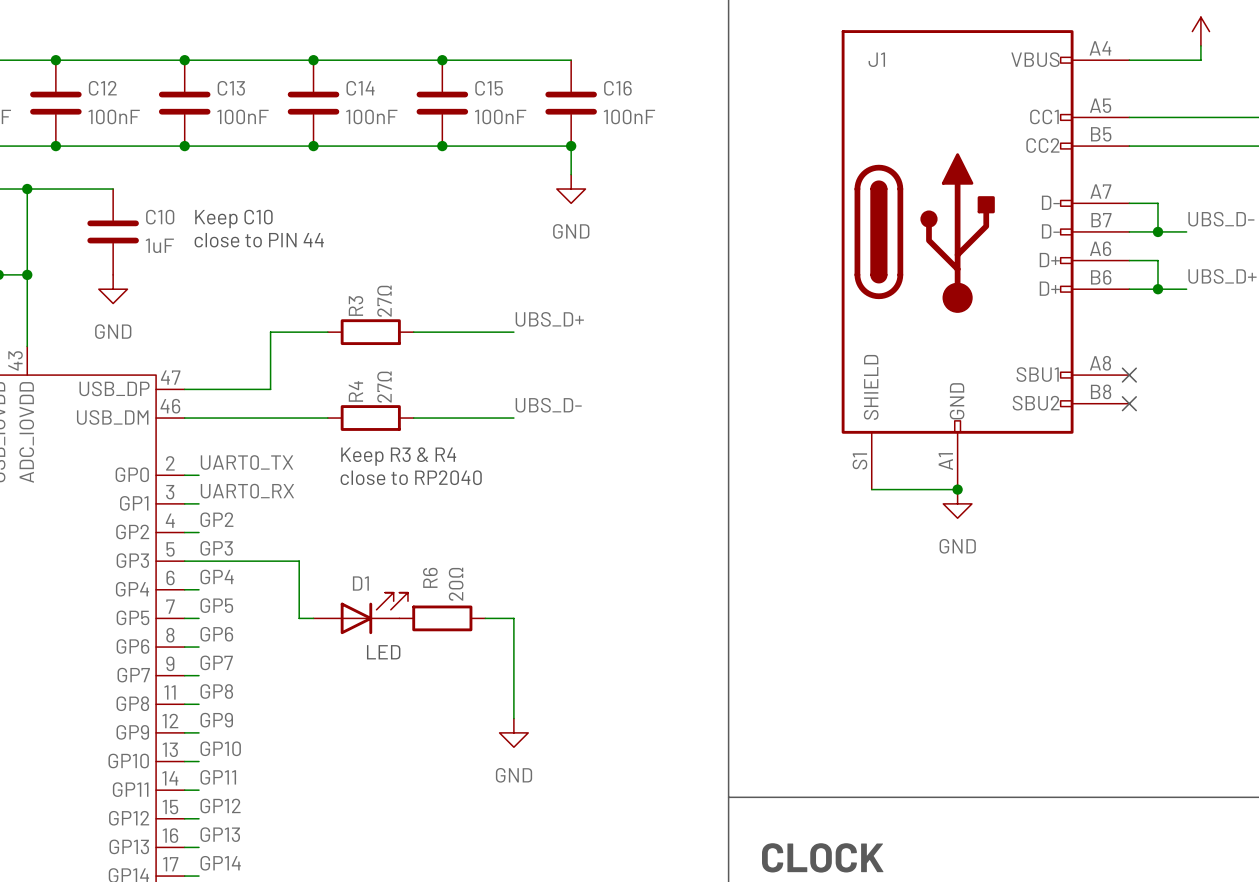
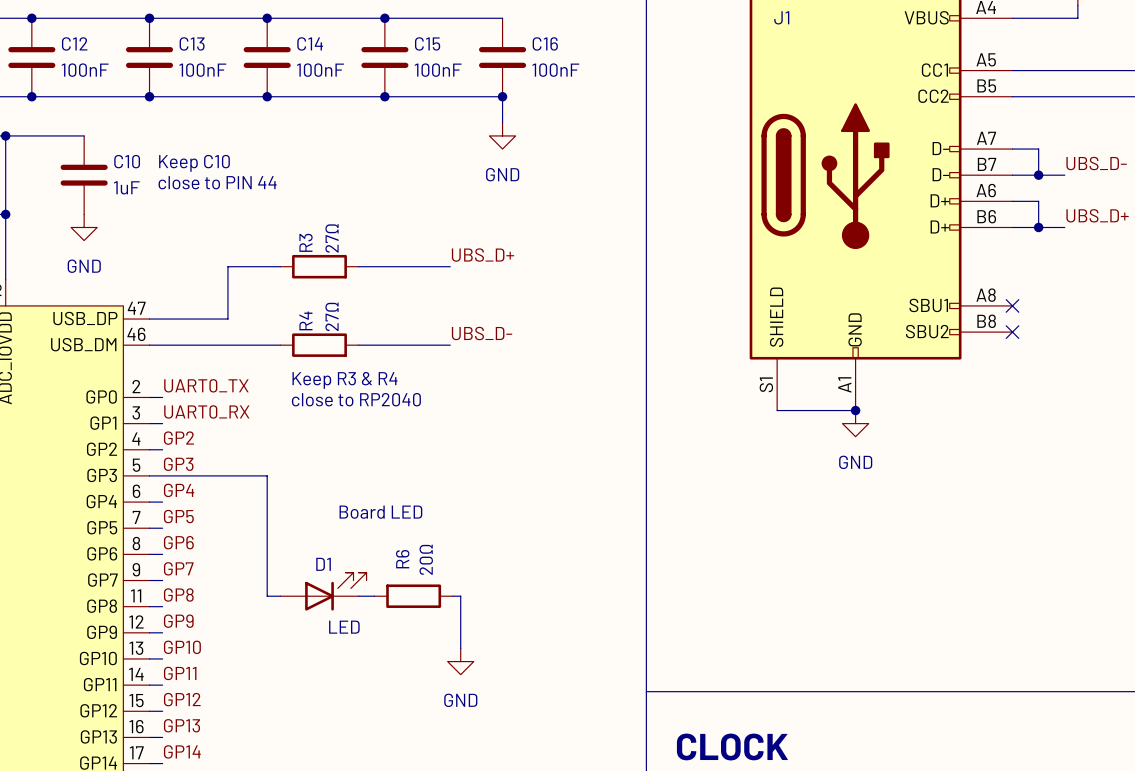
wire: (299, 561) (299, 618) (313, 618) -> (254, 475) (267, 475) (267, 596) (280, 596)
R6 value position: 20Ω (456, 584) -> 20Ω (426, 559)
text: none -> Board LED (380, 512)
D1 position: (360, 613) -> (323, 591)
R6 position: (442, 618) -> (413, 596)
wire: (485, 618) (513, 618) (513, 718) -> none
text position: LED (383, 652) -> LED (344, 627)
wire: none -> (358, 596) (374, 596)
wire: none -> (452, 596) (460, 596) (460, 648)
power symbol position: GND (513, 732) -> GND (460, 661)

